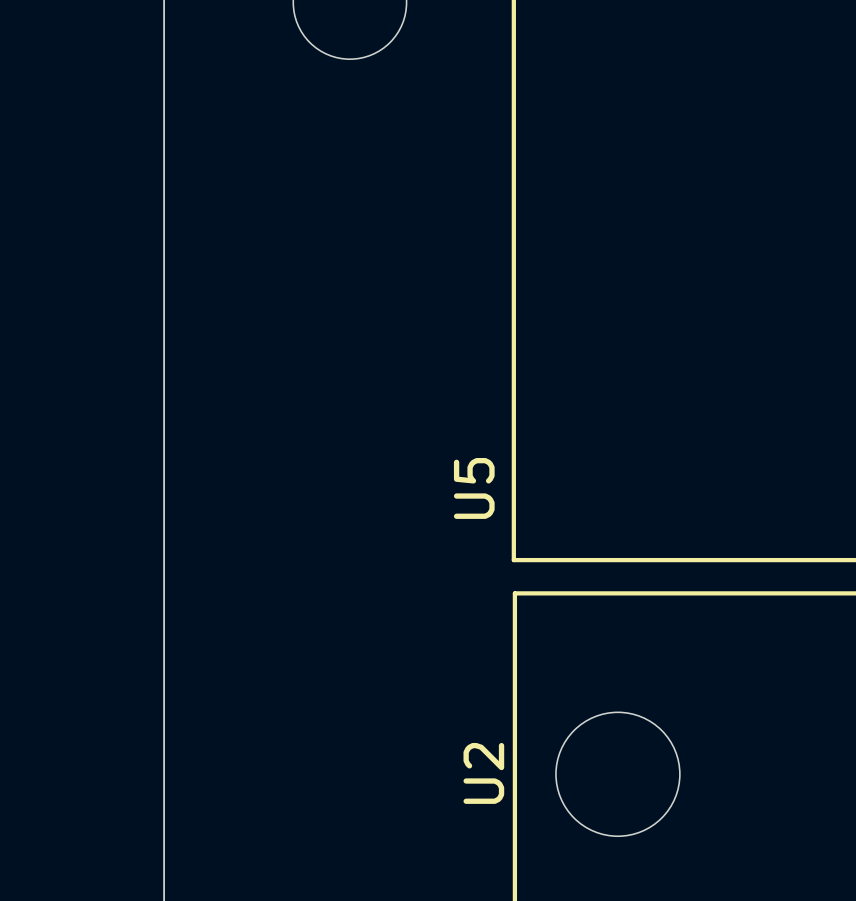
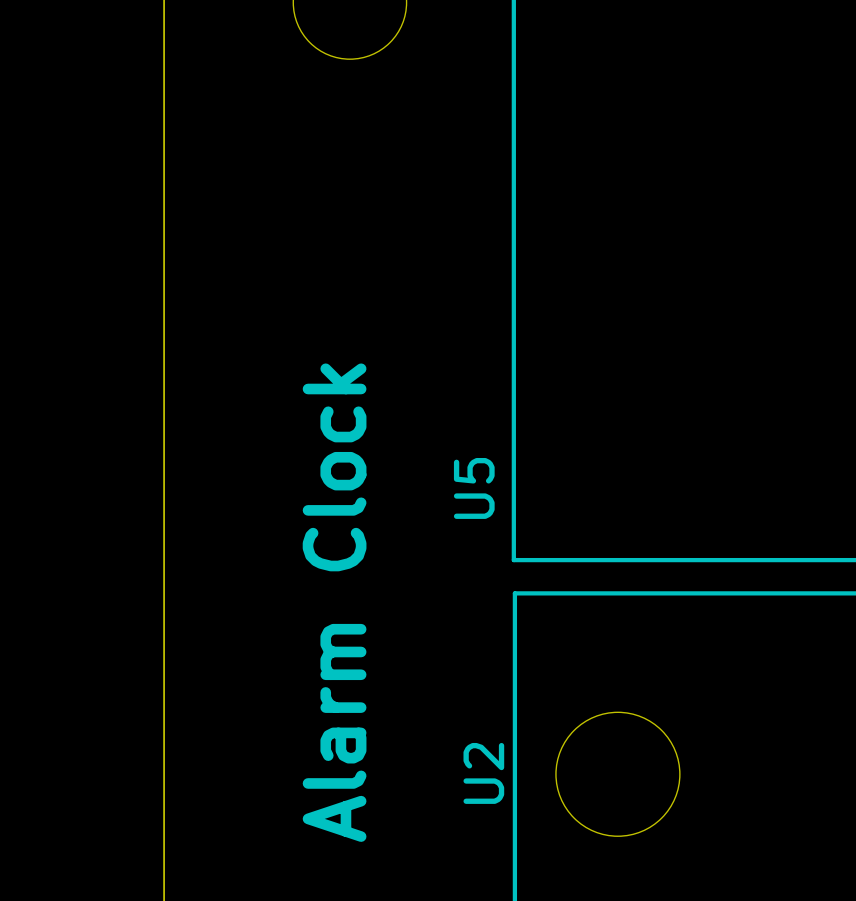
text: none -> Alarm Clock (334, 602)

